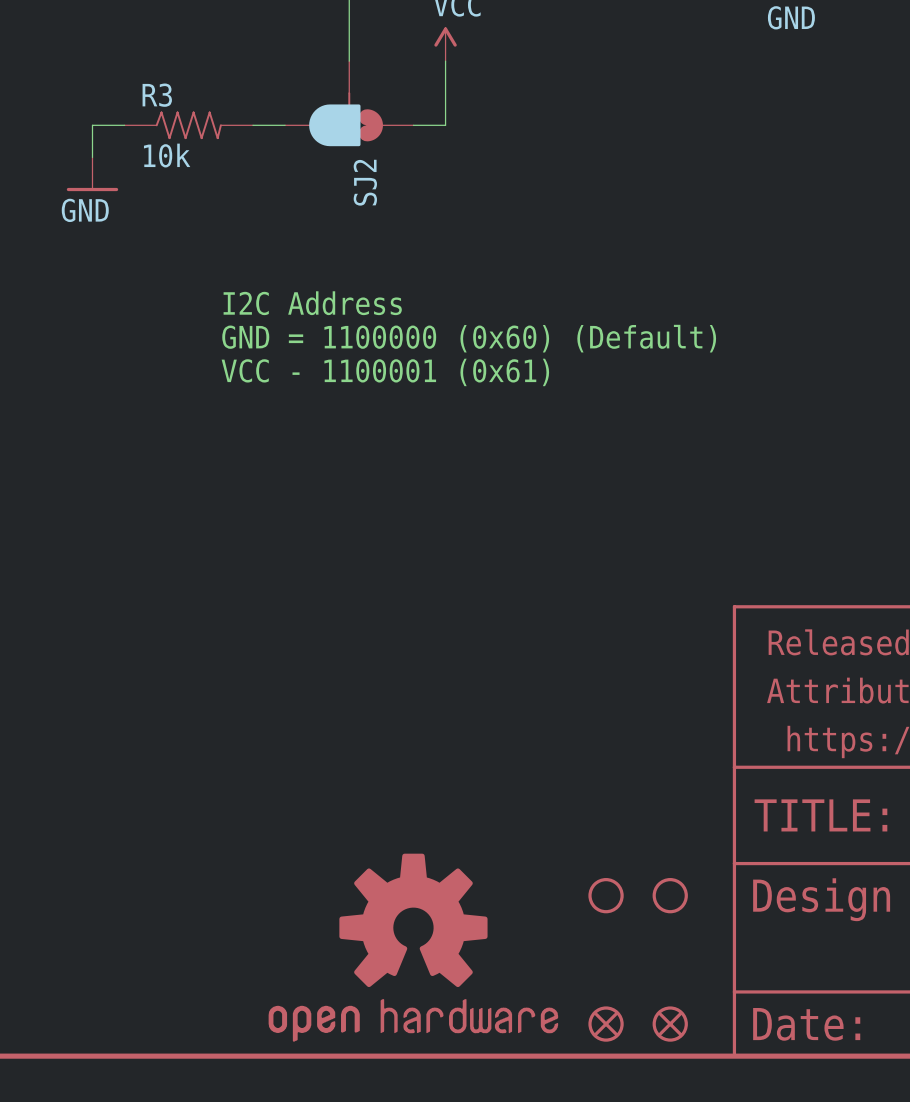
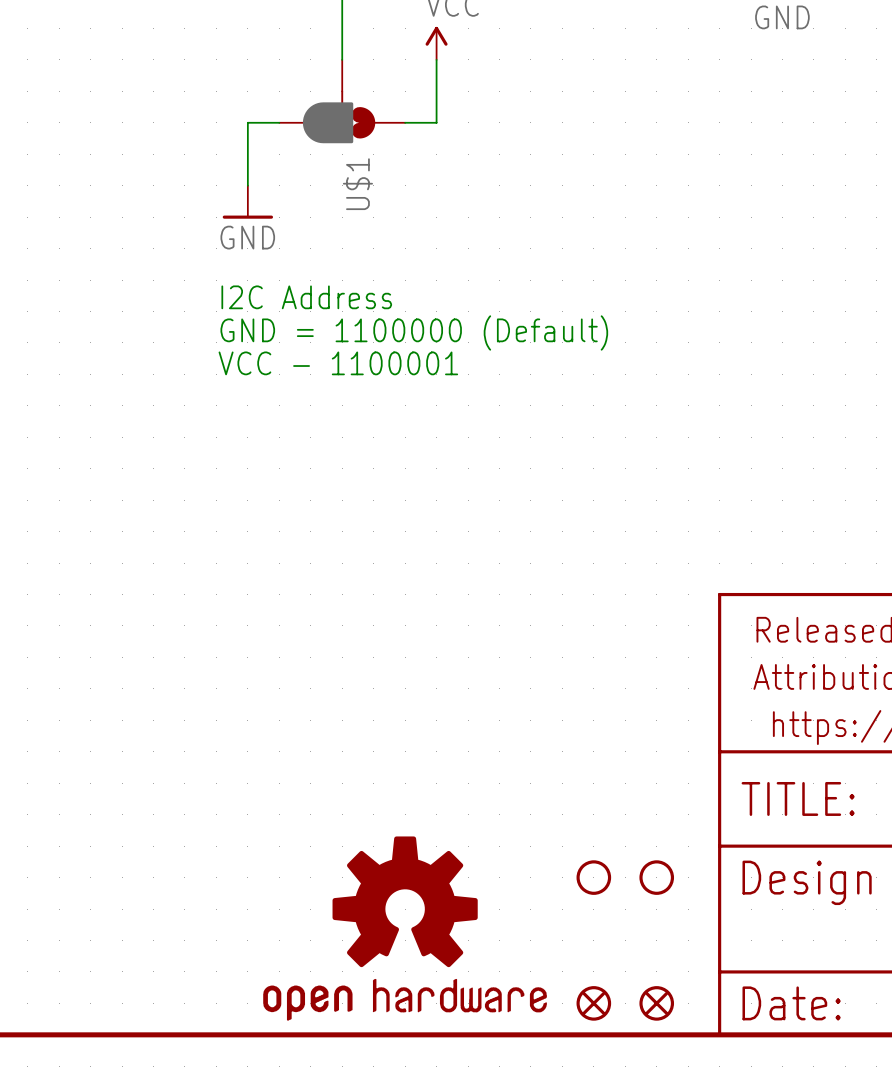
wire: (124, 125) (92, 125) (92, 157) -> none
R3: 10k (188, 125) -> none
wire: none -> (247, 122) (247, 185)
power symbol position: GND (92, 174) -> GND (247, 202)
SJ2 name: SJ2 (365, 182) -> U$1 (357, 184)
text: GND = 1100000 (0x60) (Default) (469, 338) -> GND = 1100000 (Default) (414, 332)
text: VCC - 1100001 (0x61) (385, 372) -> VCC - 1100001 (338, 363)

